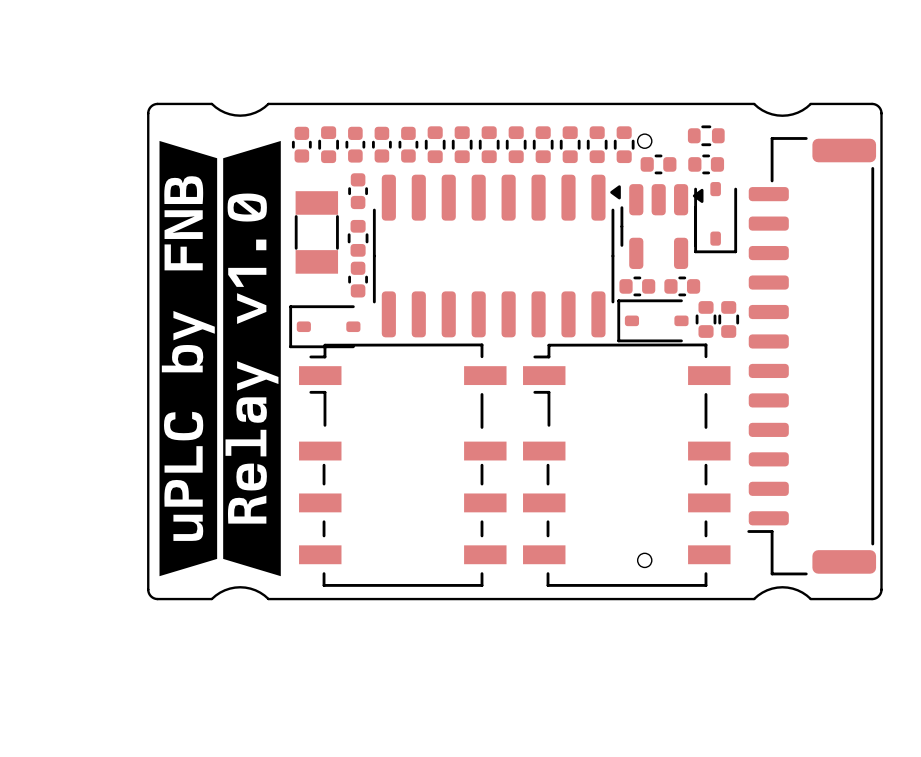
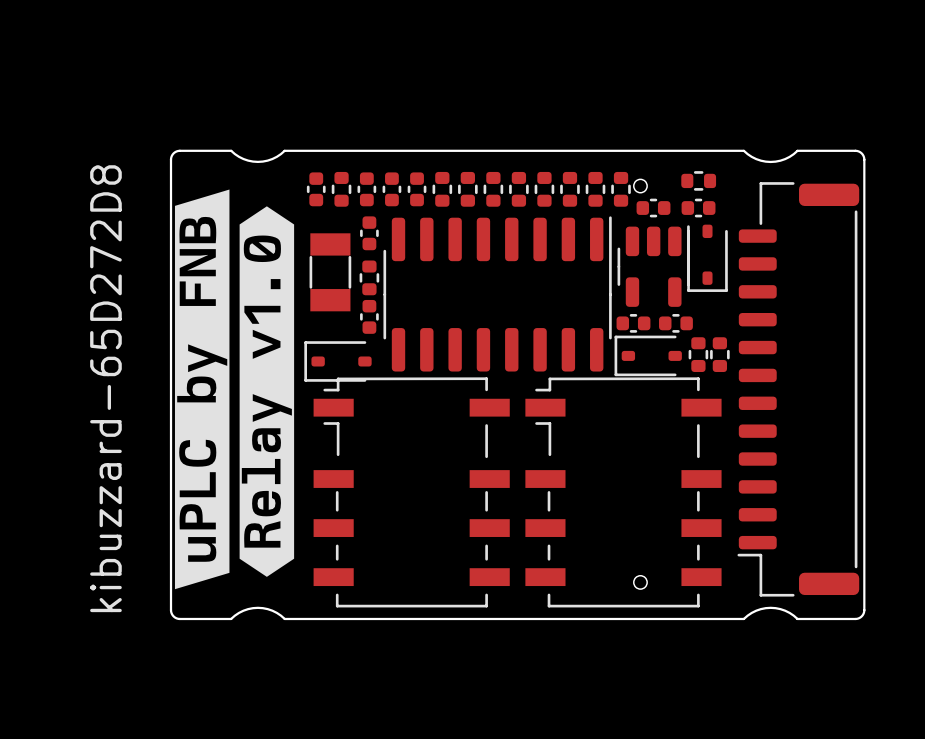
drawing: [159, 140, 218, 577] -> none
drawing shape: [223, 140, 281, 577] -> [239, 206, 295, 577]
part footprint: [372, 174, 621, 338] -> [383, 216, 612, 372]
part footprint: [620, 184, 704, 269] -> [617, 225, 690, 307]
kibuzzard-65D272D8: none -> (202, 389)

